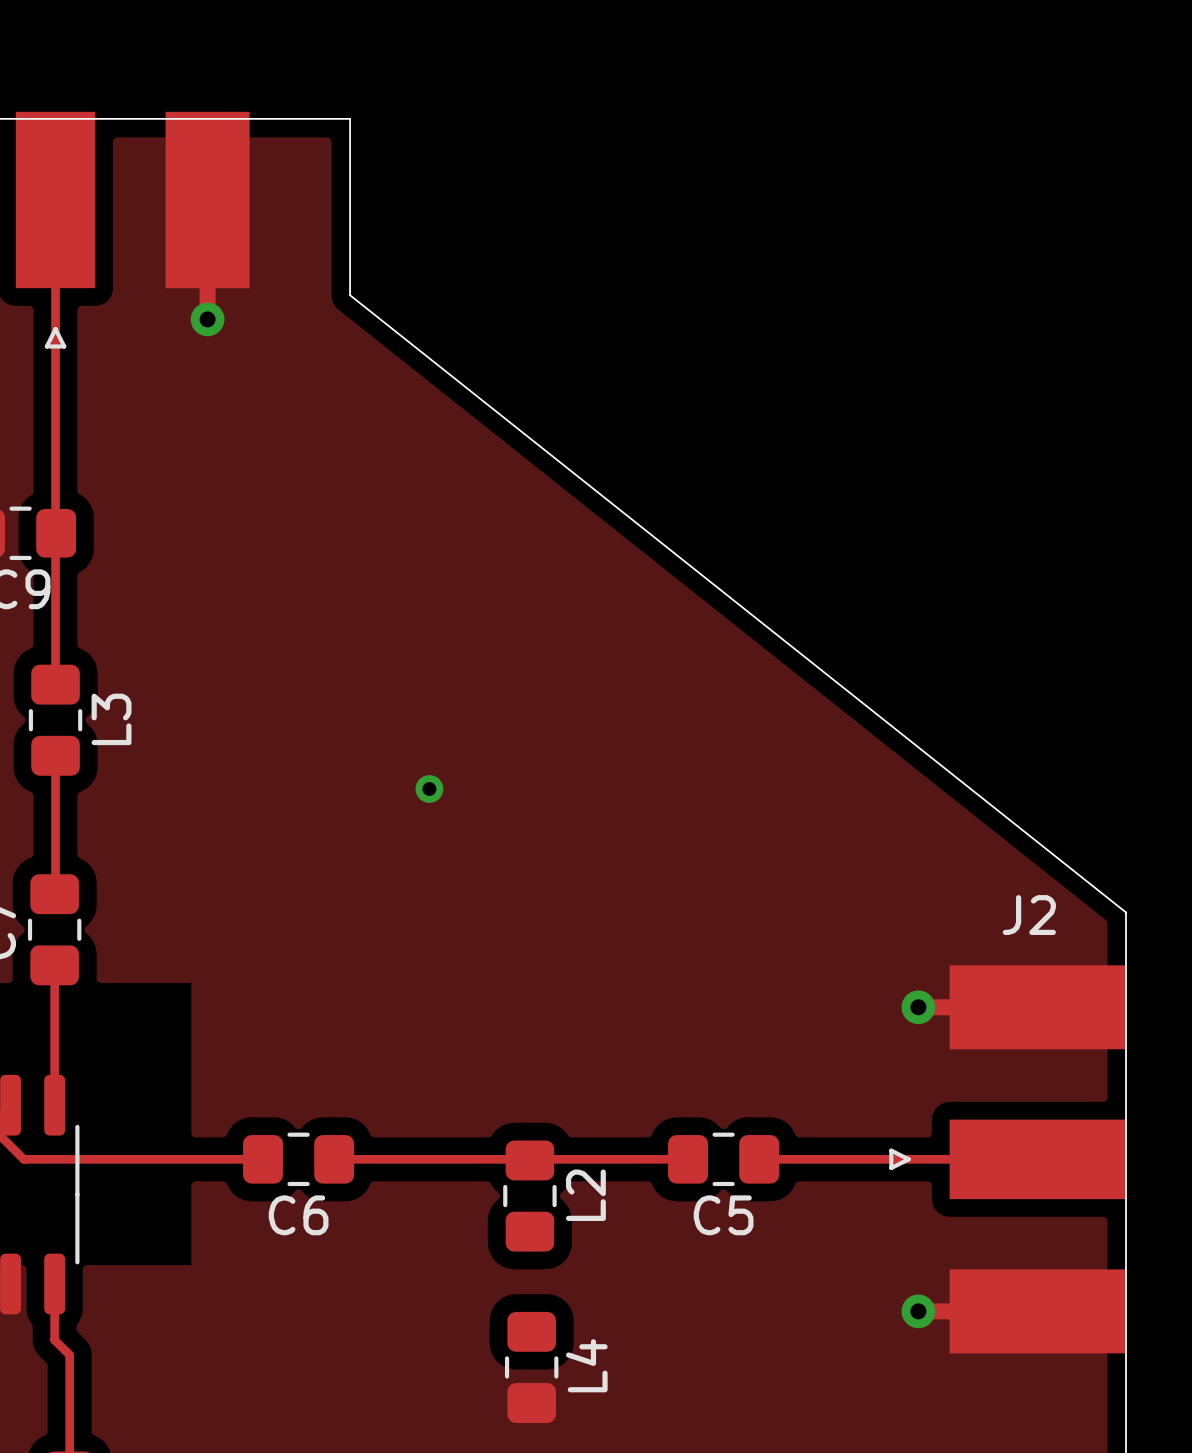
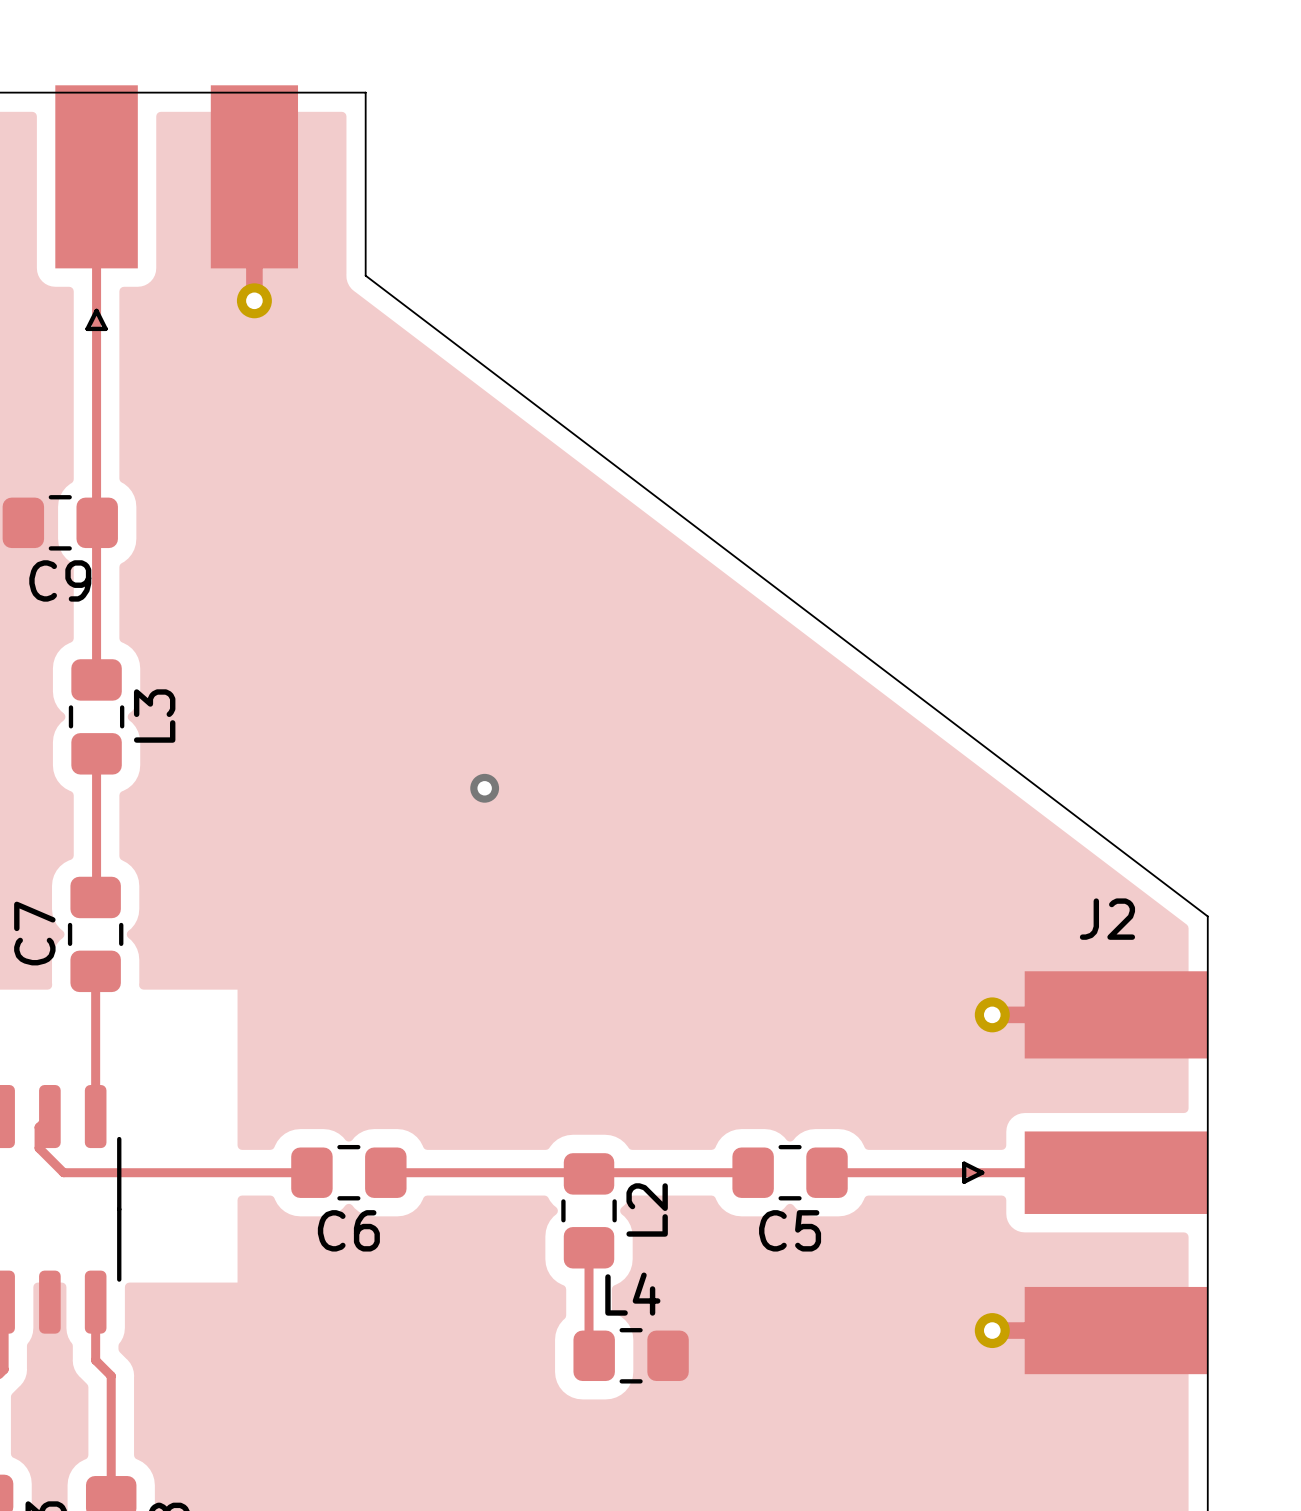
board edge: (314, 118) (350, 118) (350, 295) (1125, 912) -> (365, 92) (365, 275) (1207, 916)
track: none -> (589, 1247) (589, 1349) (590, 1351)
L4 name position: L4 (586, 1365) -> L4 (632, 1294)
L4 rotation: 0° (531, 1367) -> 90° clockwise (631, 1355)

